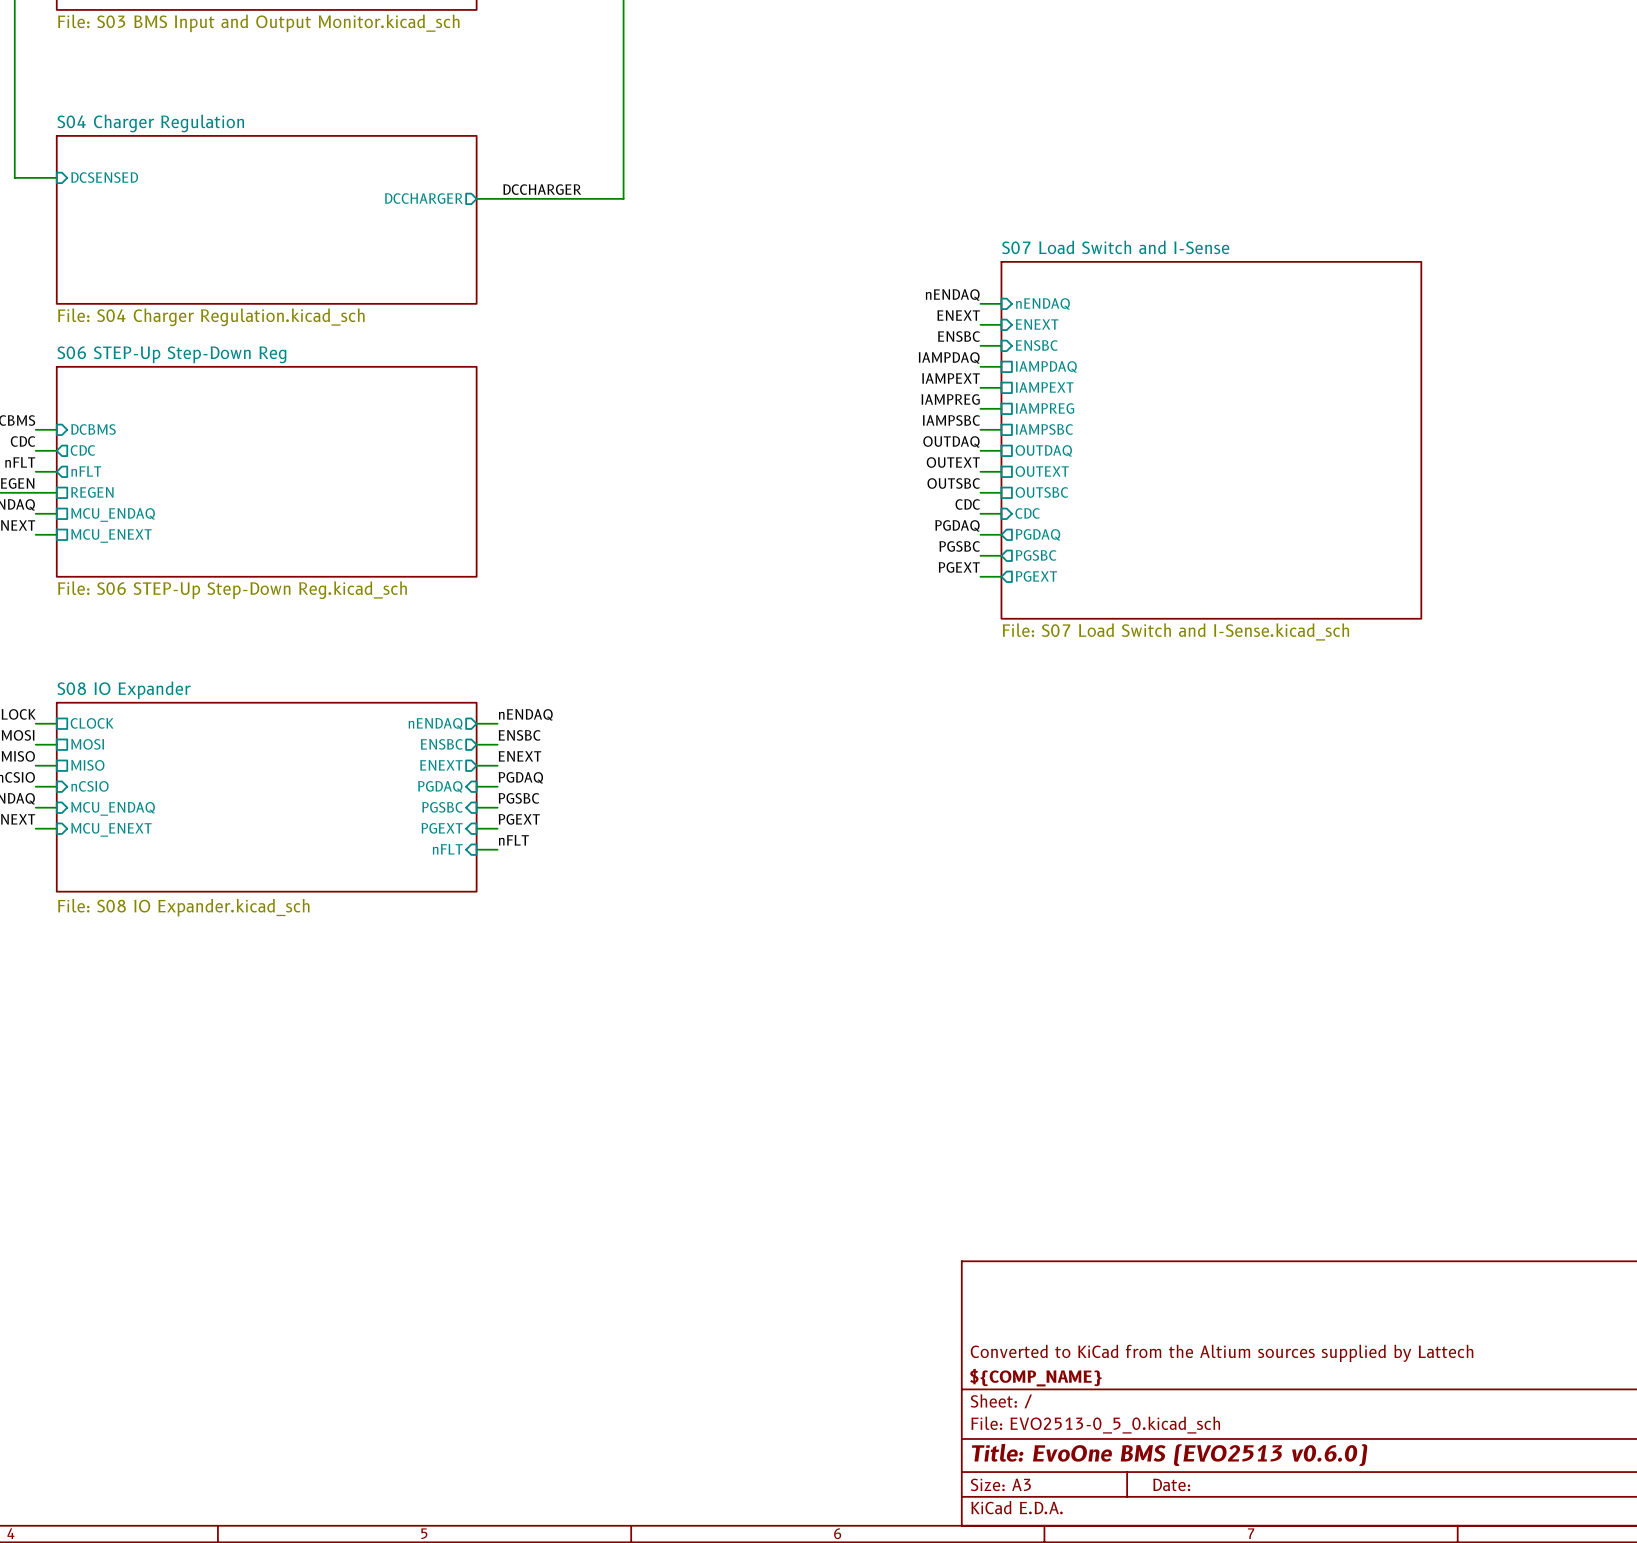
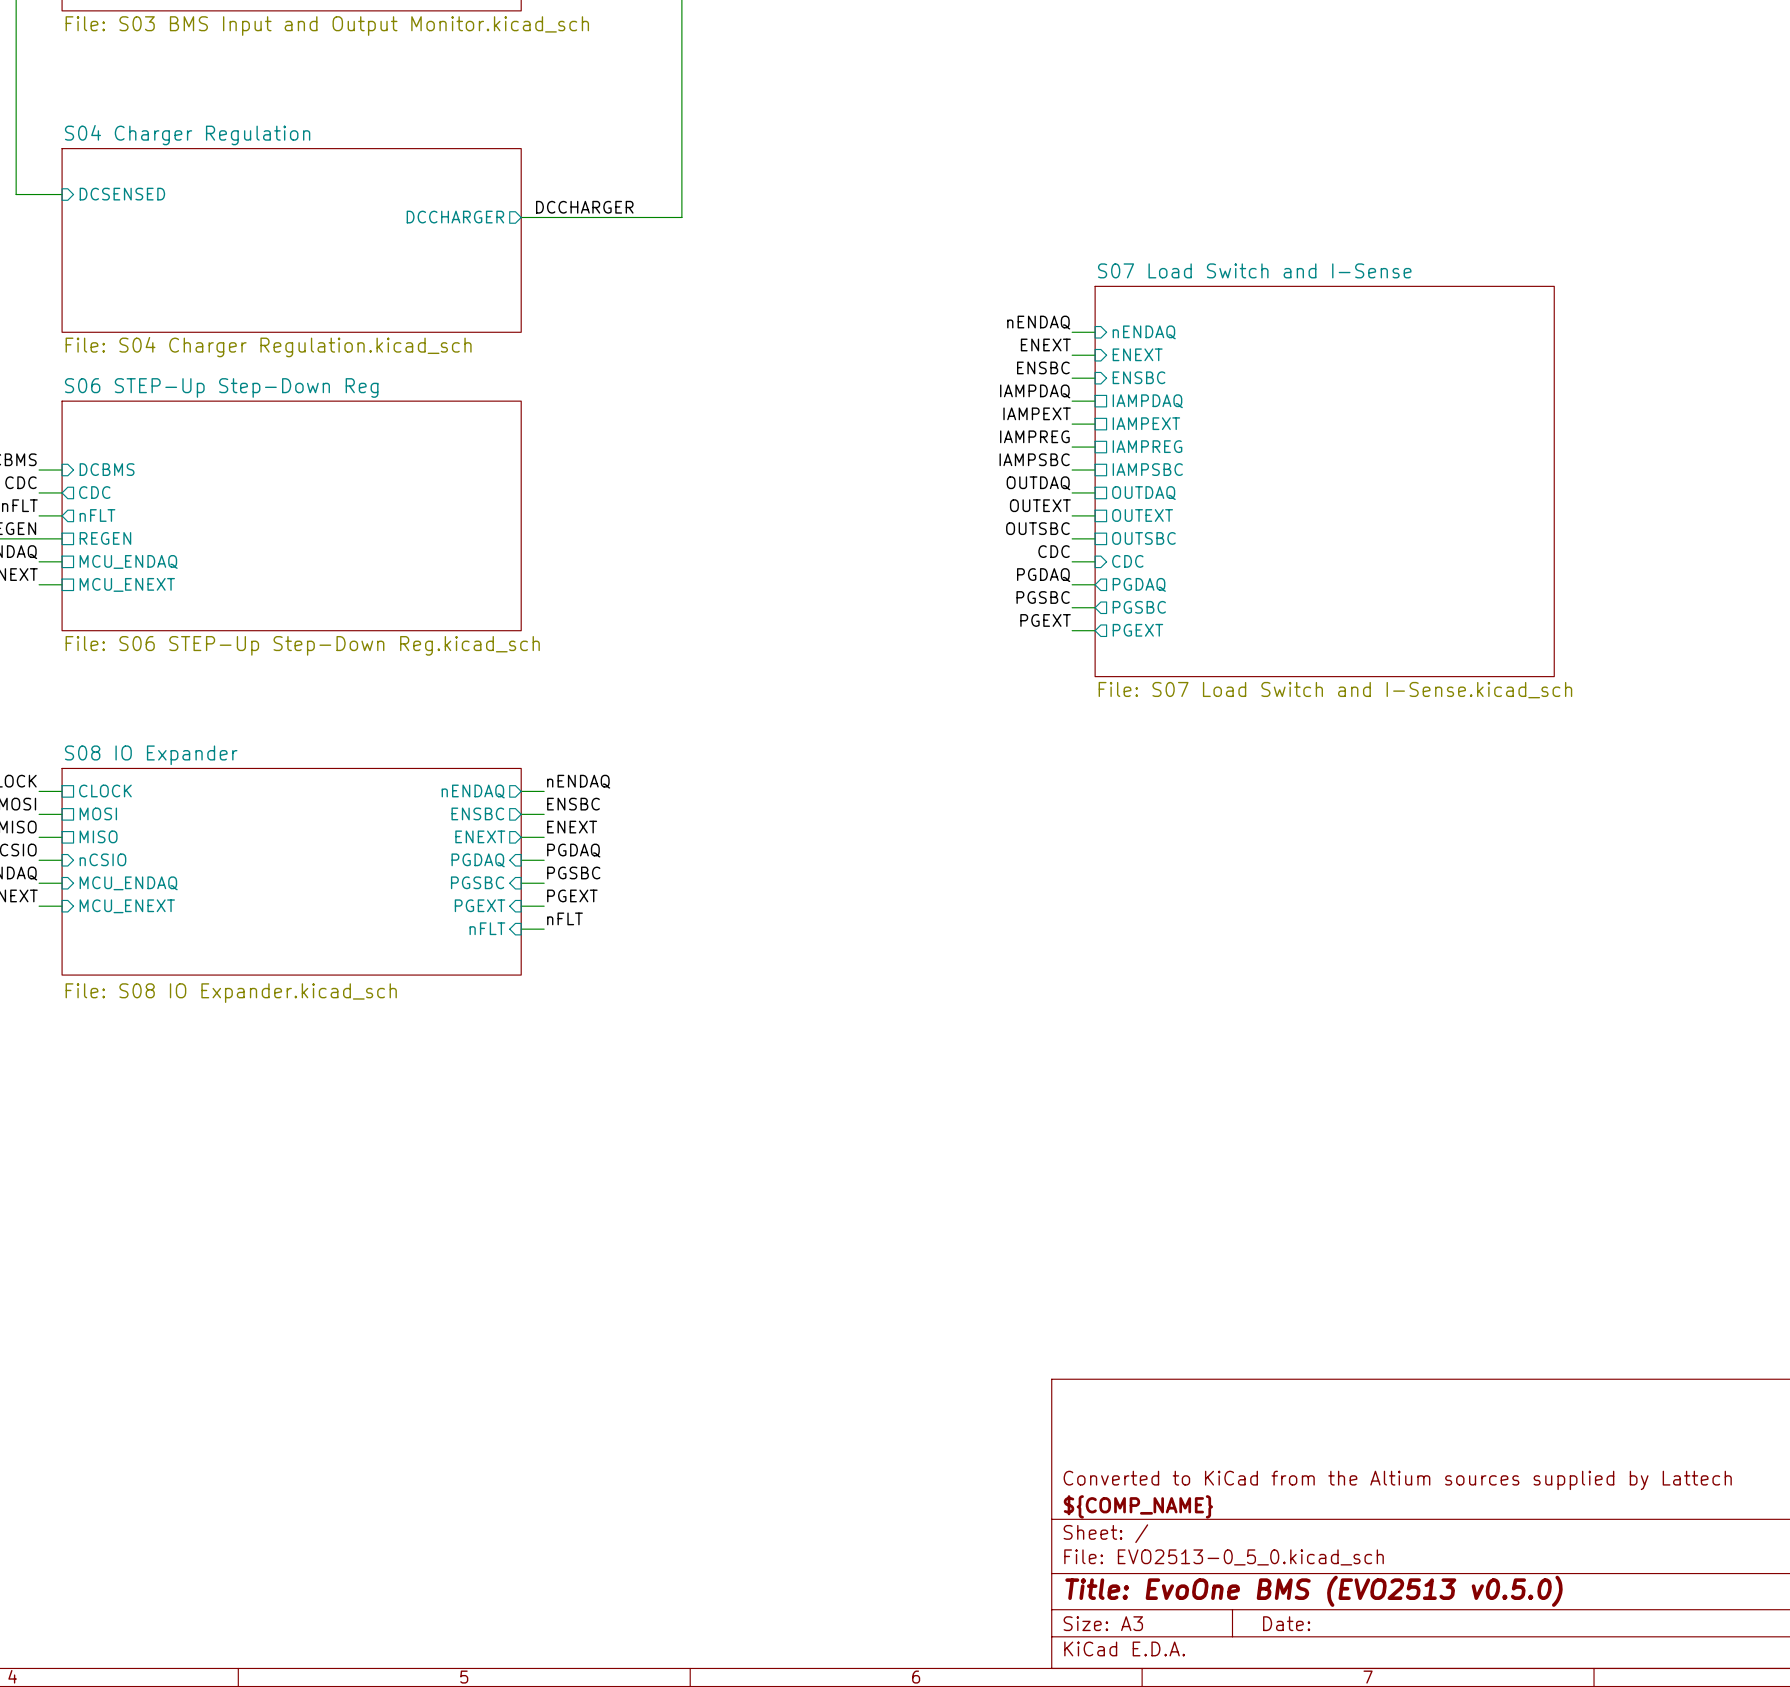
title block: Title: EvoOne BMS (EVO2513 v0.6.0) (1169, 1454) -> Title: EvoOne BMS (EVO2513 v0.5.0) (1314, 1591)

